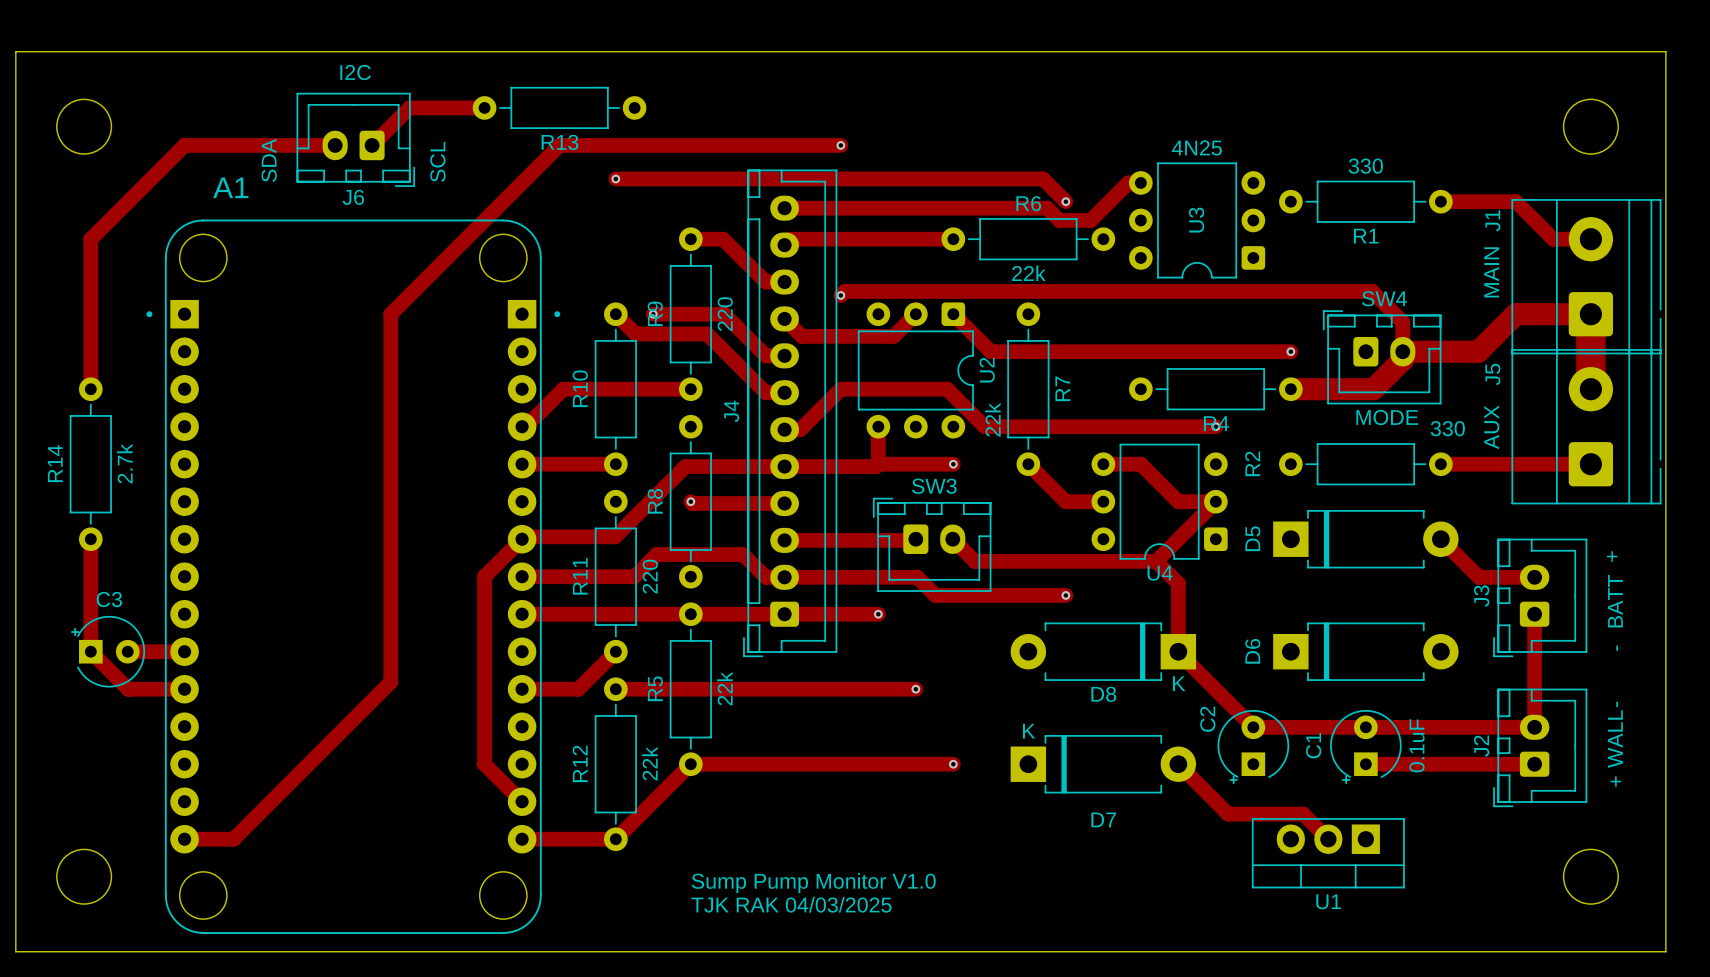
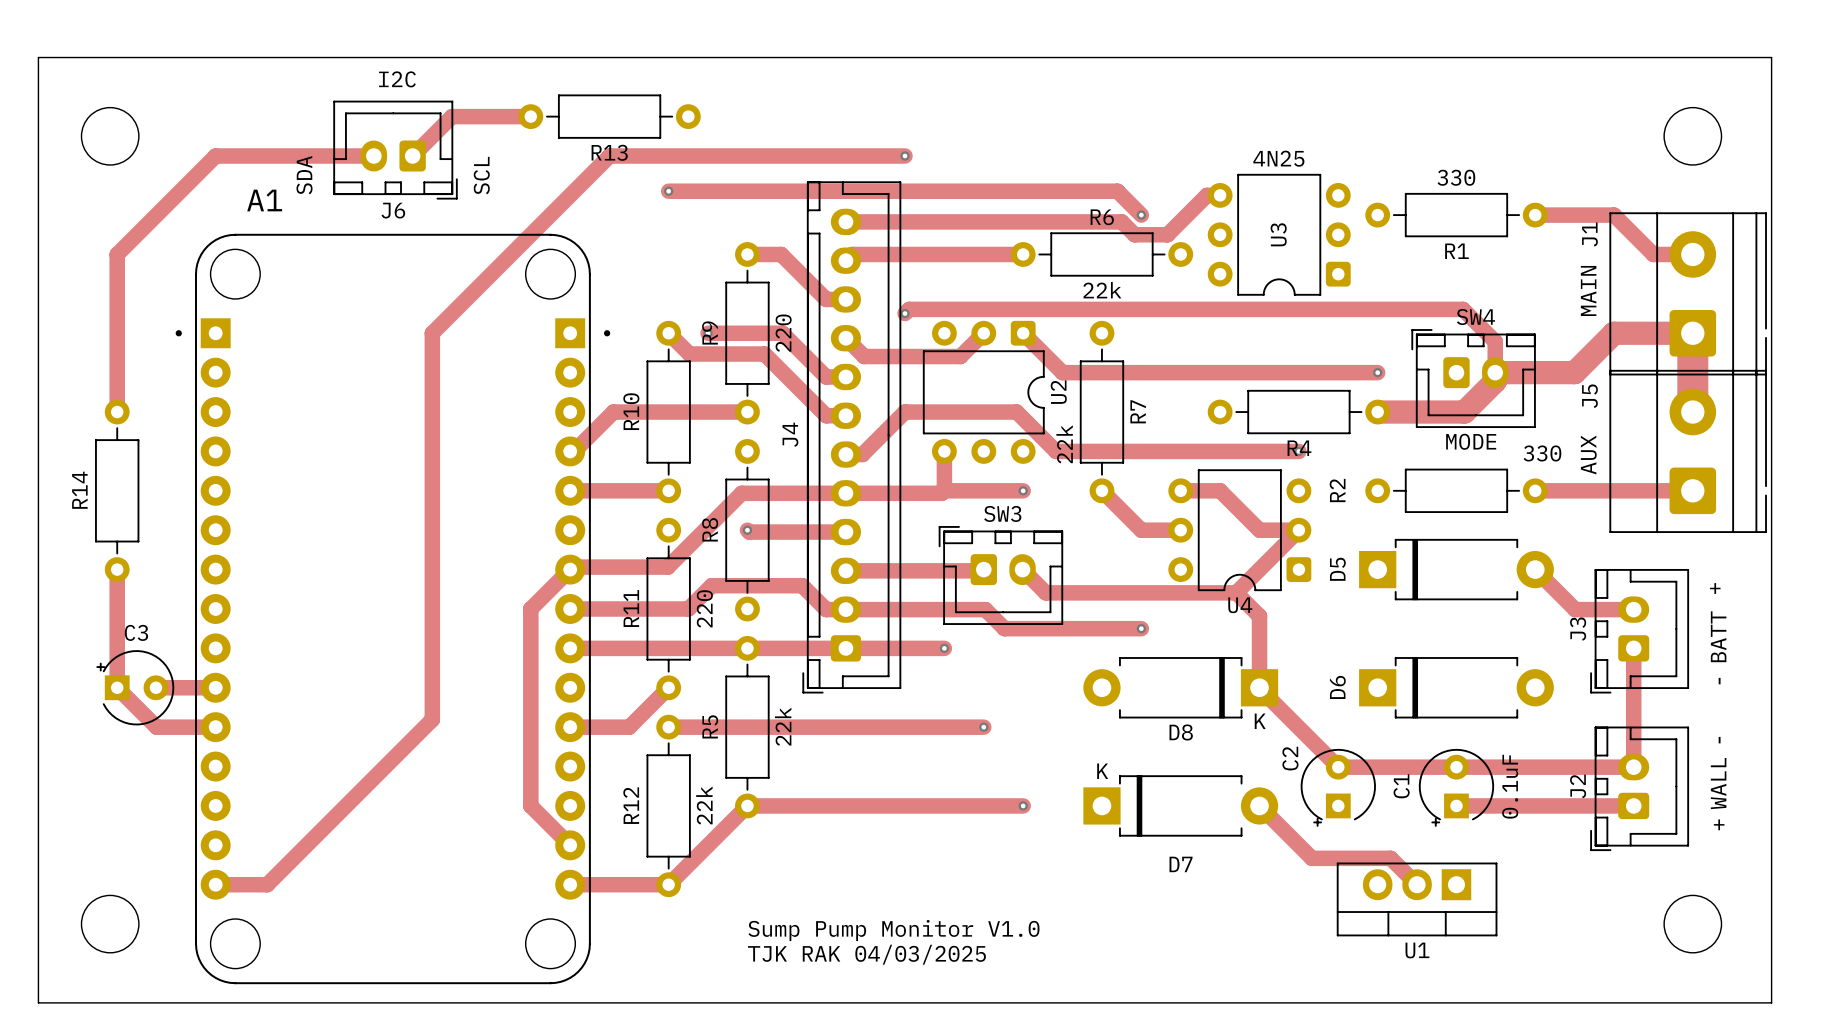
R14 value: 2.7k (124, 463) -> none

